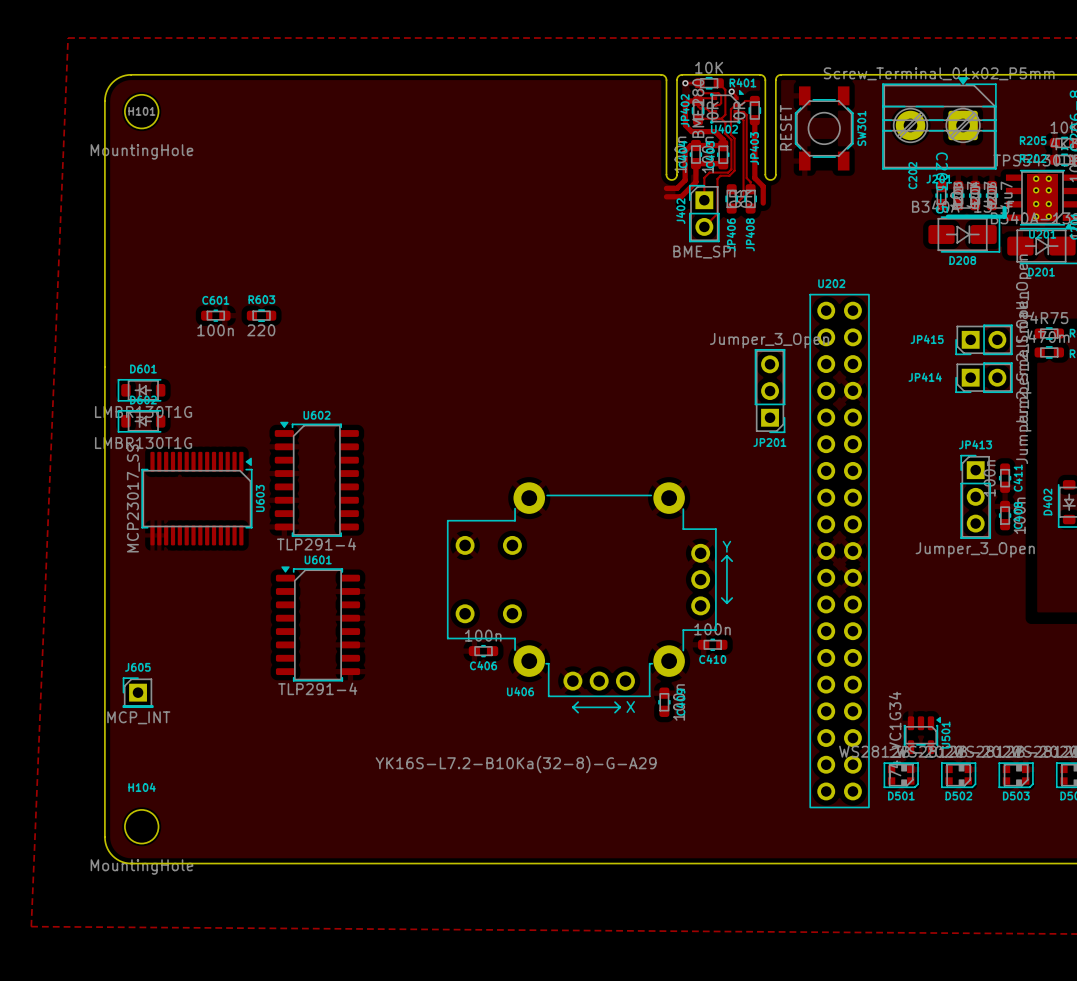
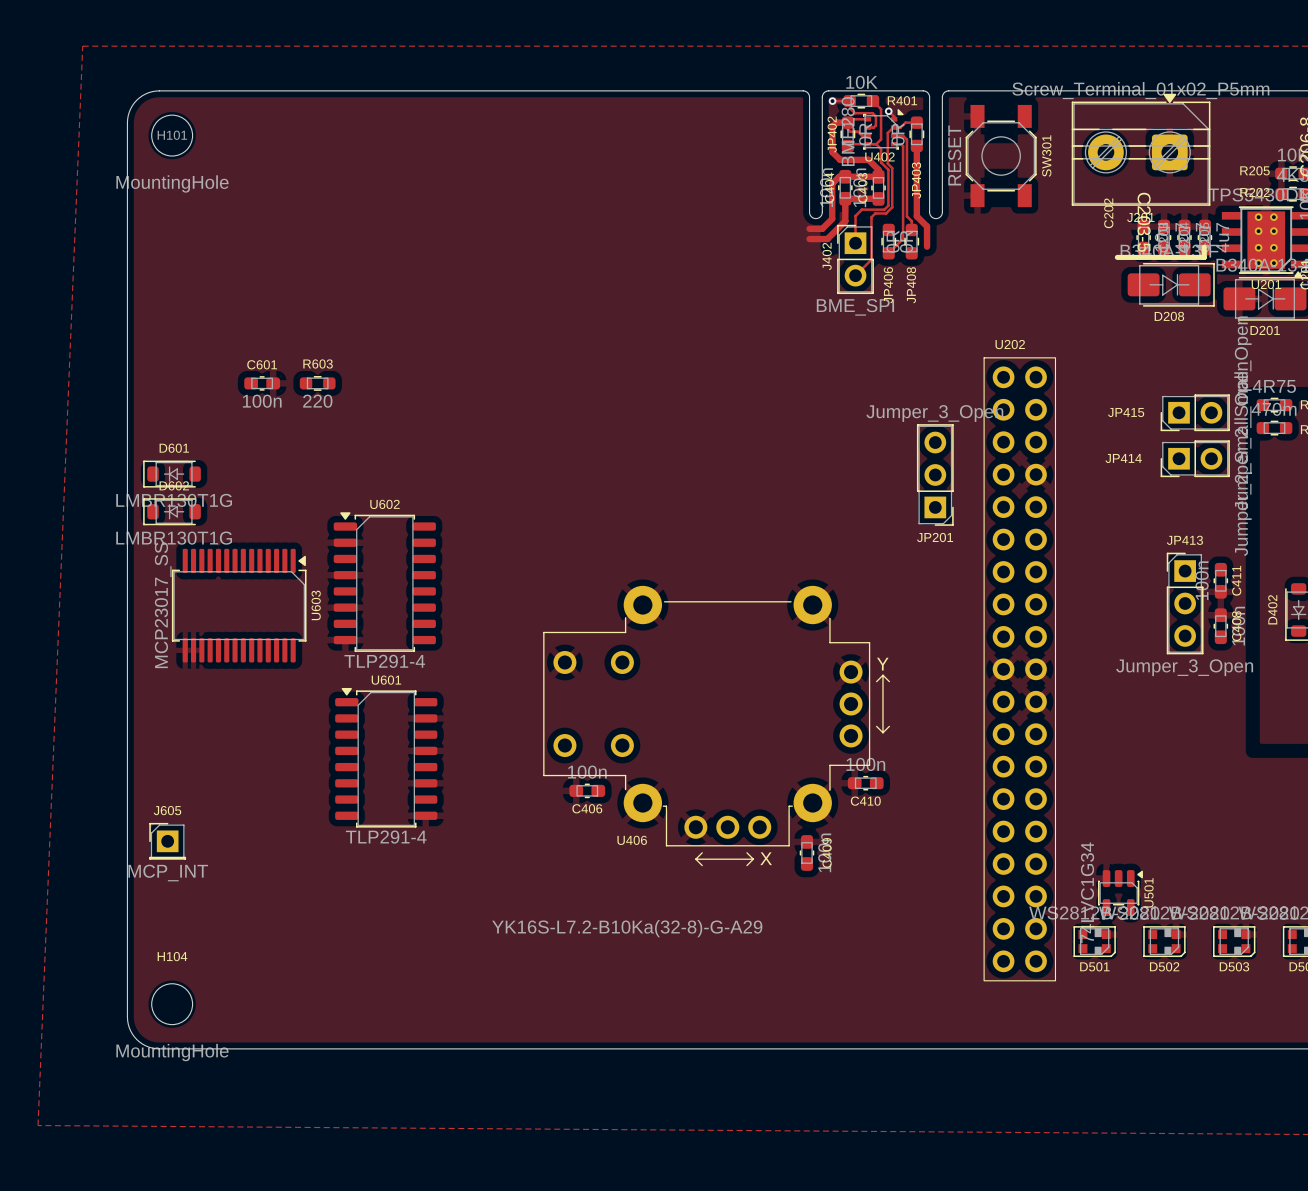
line: none -> (1204, 247) (1204, 257) (1117, 257)
line: (1004, 208) (1004, 216) (947, 216) -> none

